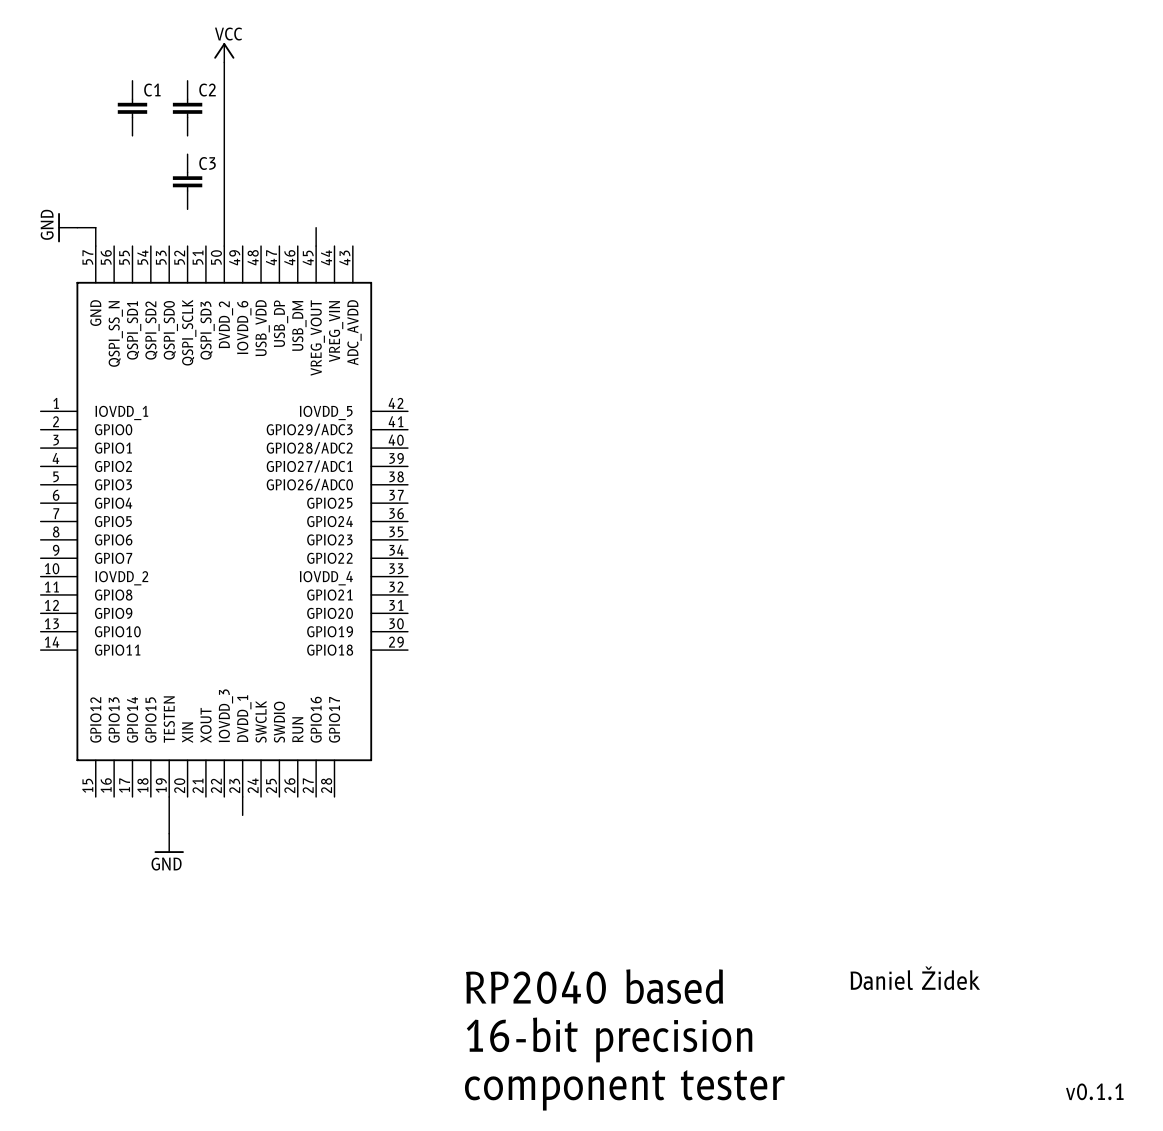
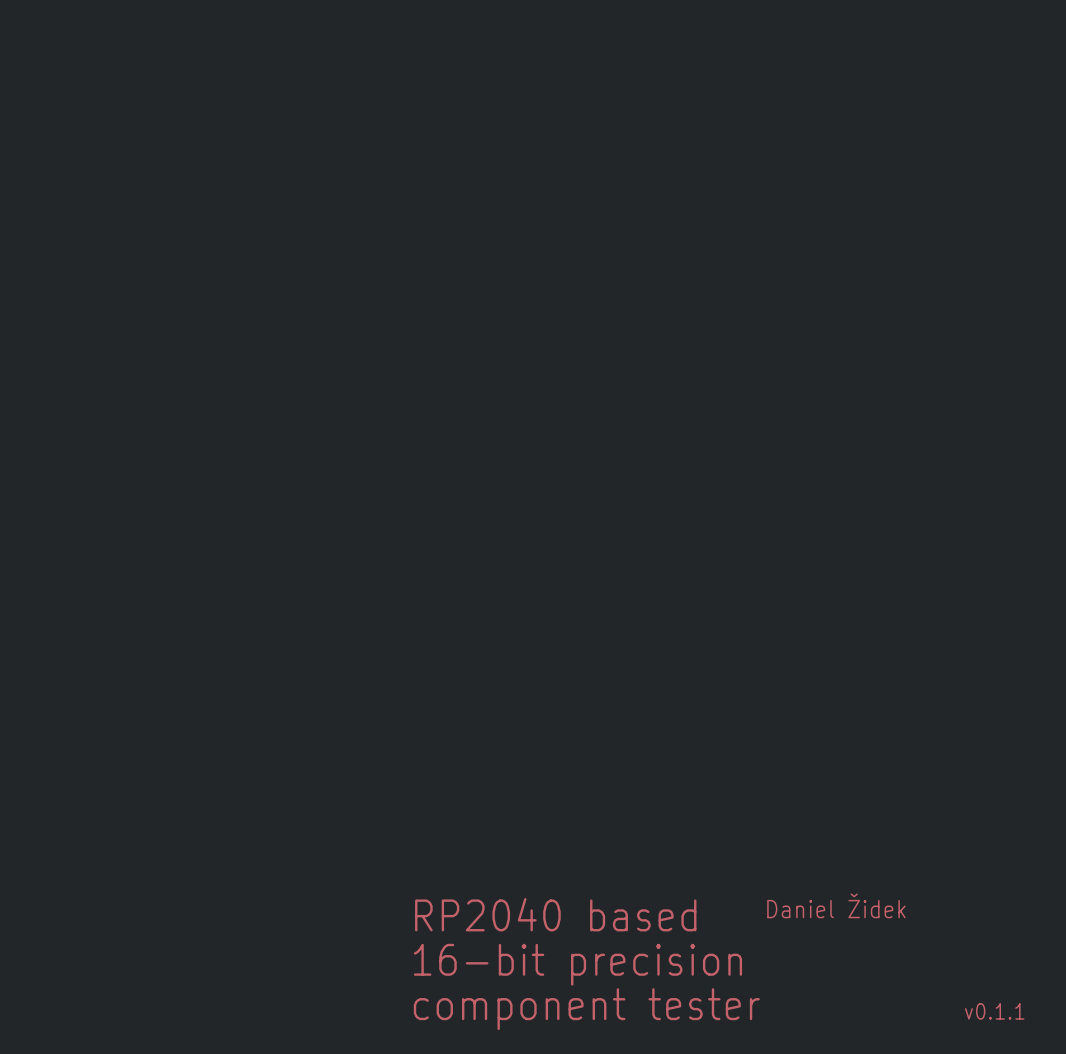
power symbol: VCC (224, 52) -> none
wire: (224, 62) (224, 246) -> none
C1: (132, 108) -> none
C2: (187, 108) -> none
C3: (187, 181) -> none
power symbol: GND (67, 227) -> none
wire: (77, 227) (95, 227) (95, 246) -> none
wire: (316, 227) (316, 246) -> none
part: (224, 521) -> none
wire: (169, 796) (169, 833) -> none
wire: (242, 796) (242, 815) -> none
power symbol: GND (169, 843) -> none

